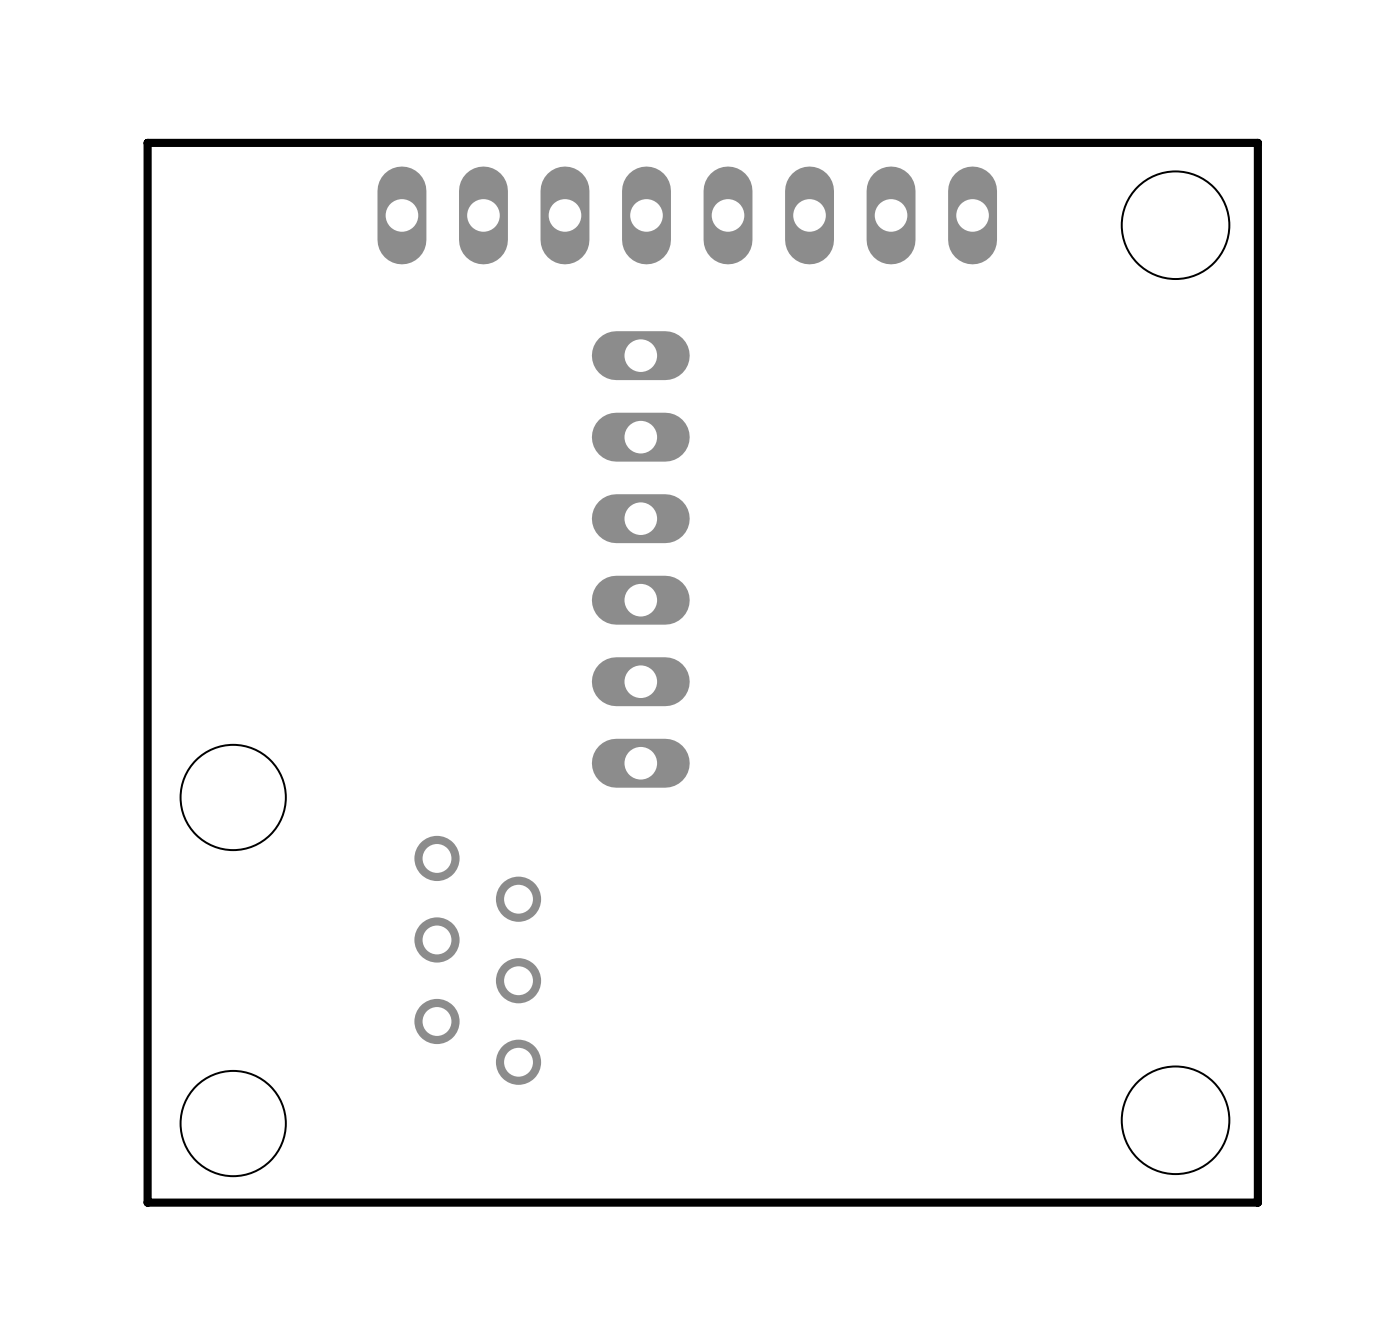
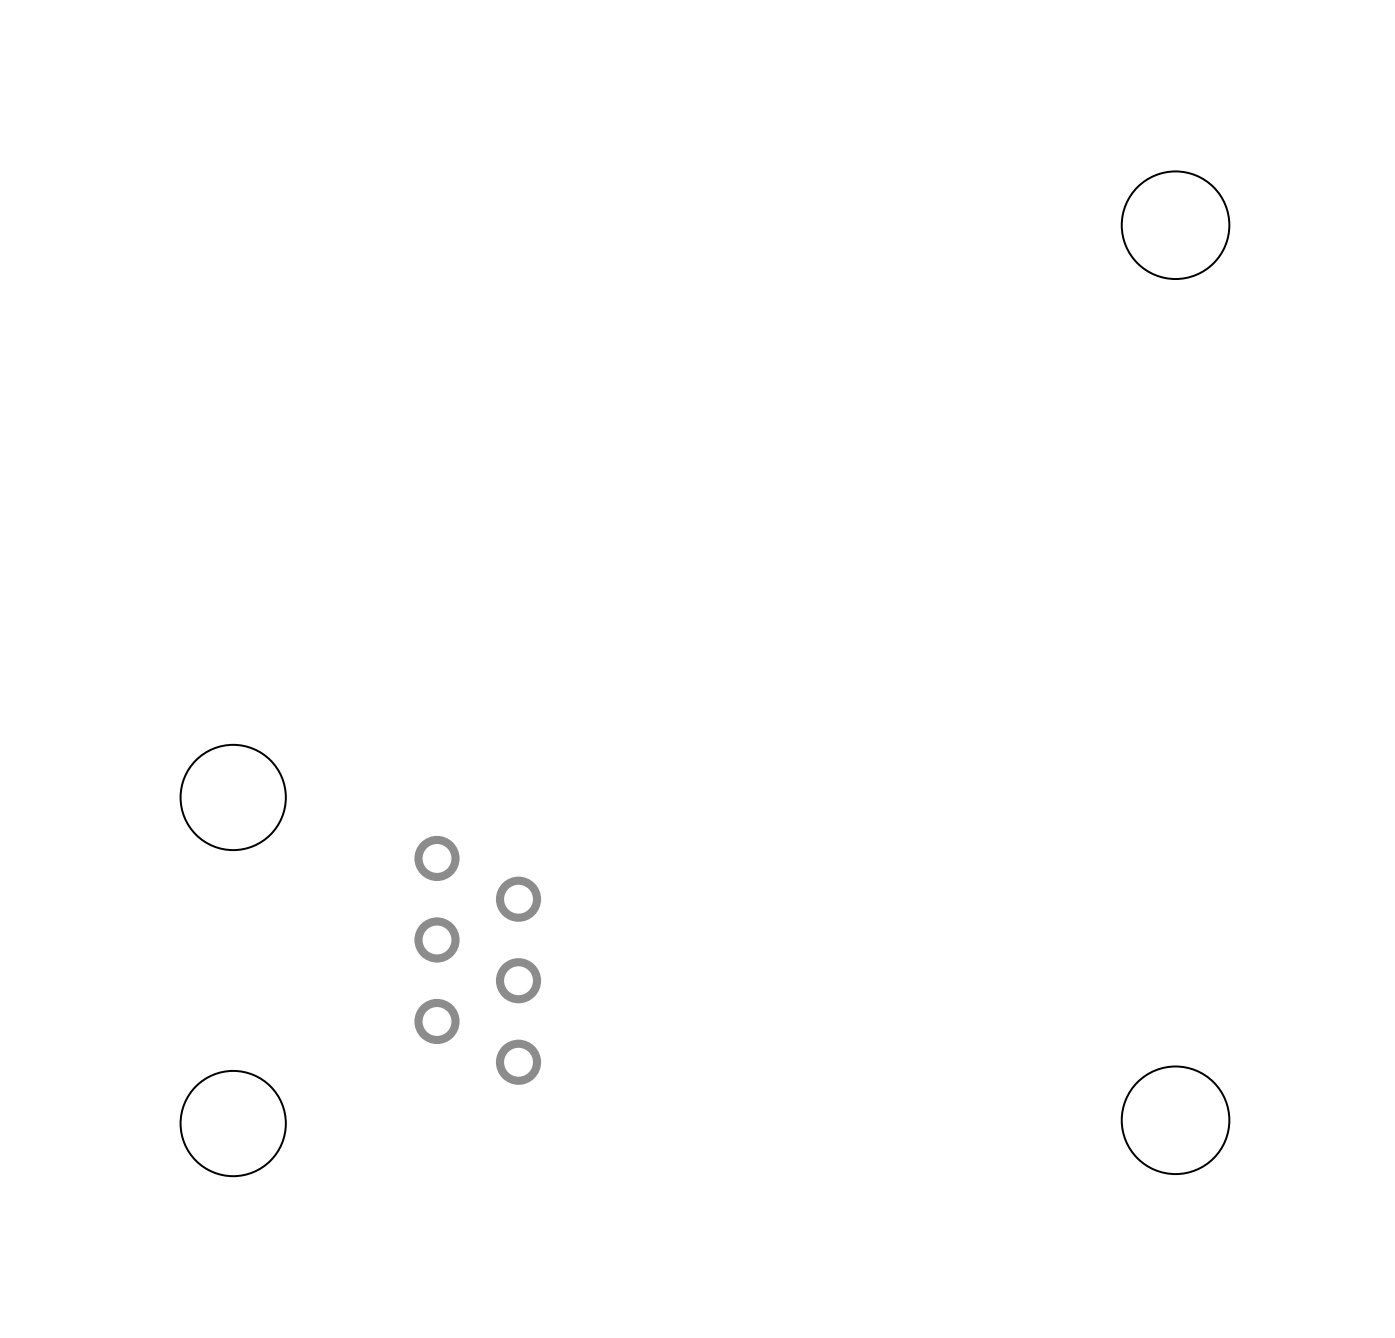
board edge: (1257, 142) (1257, 1202) (147, 1202) (147, 142) (1257, 142) -> none
part: (687, 215) -> none
part: (640, 559) -> none

